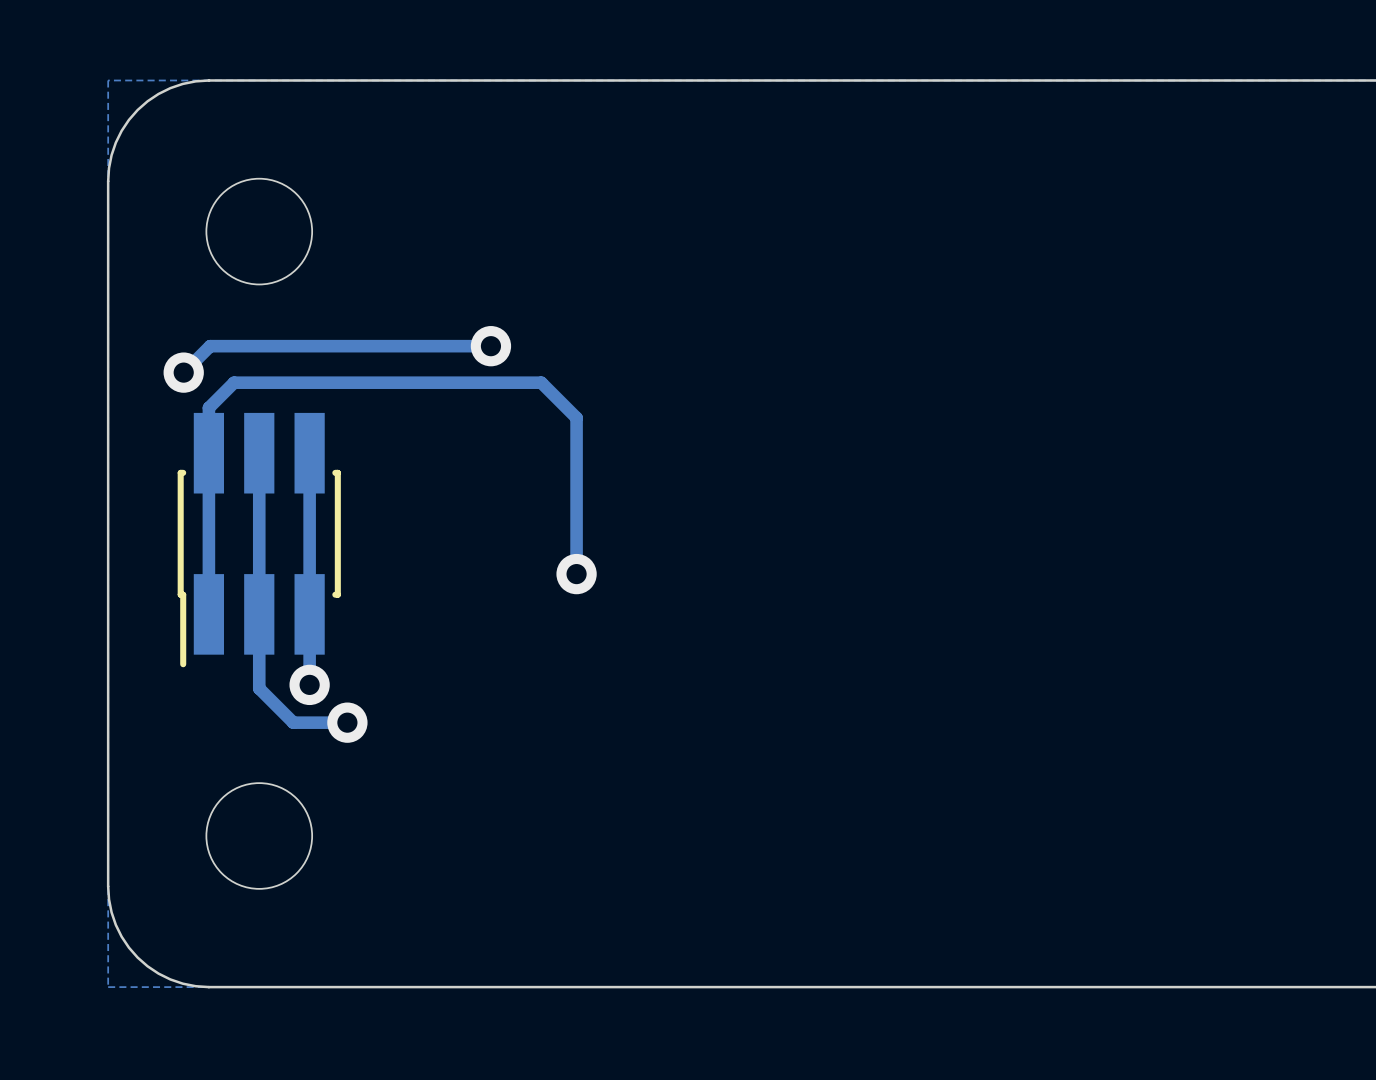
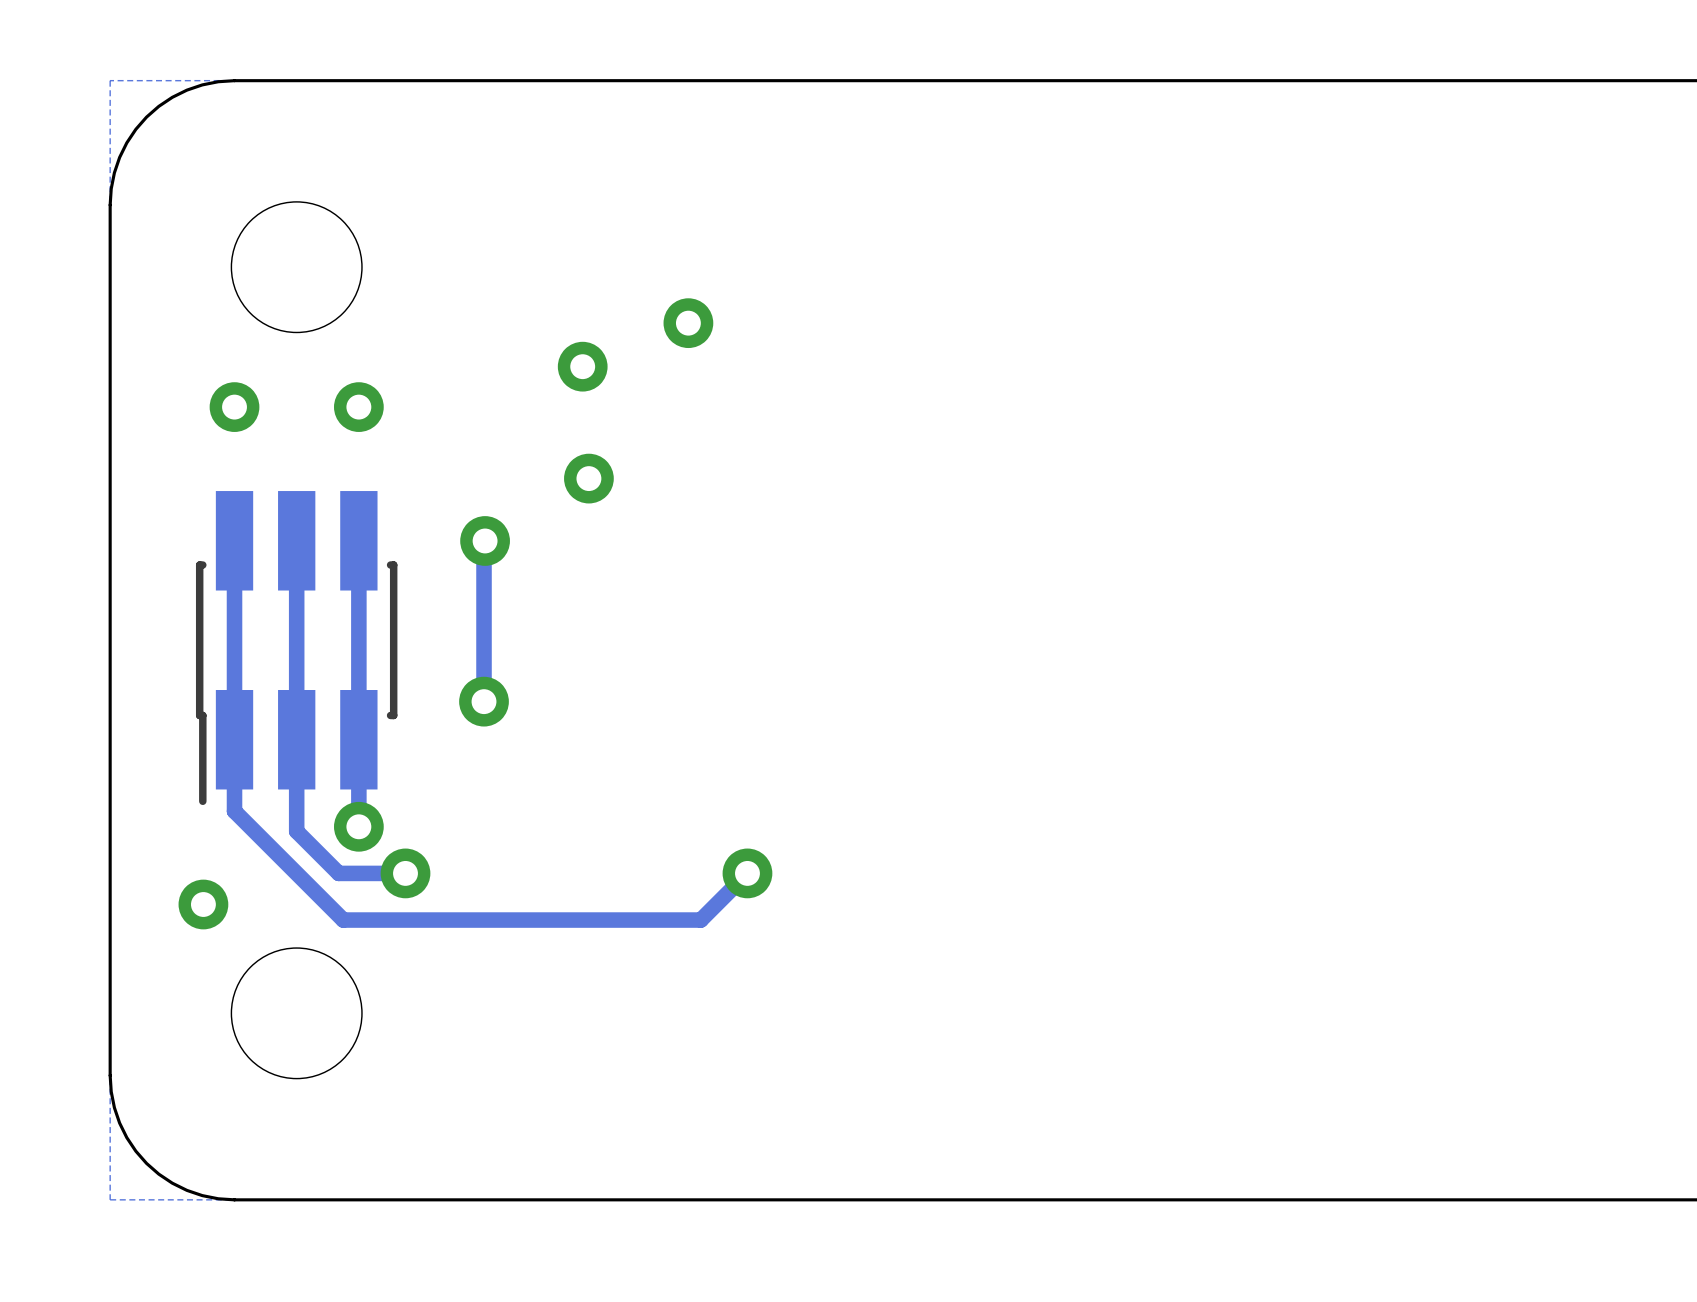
via: none -> (688, 323)
via: none -> (358, 407)
track: (490, 346) (210, 346) (183, 372) -> none
via position: (490, 346) -> (582, 366)
via position: (183, 372) -> (234, 407)
via: none -> (588, 478)
track: (208, 433) (208, 407) (234, 382) (541, 382) (576, 417) (576, 574) -> none
track: none -> (485, 540) (484, 701)
via: none -> (485, 540)
via: (576, 574) -> none
via: none -> (484, 701)
track: none -> (234, 739) (234, 811) (343, 920) (700, 920) (747, 873)
via: none -> (747, 873)
via: none -> (203, 904)

